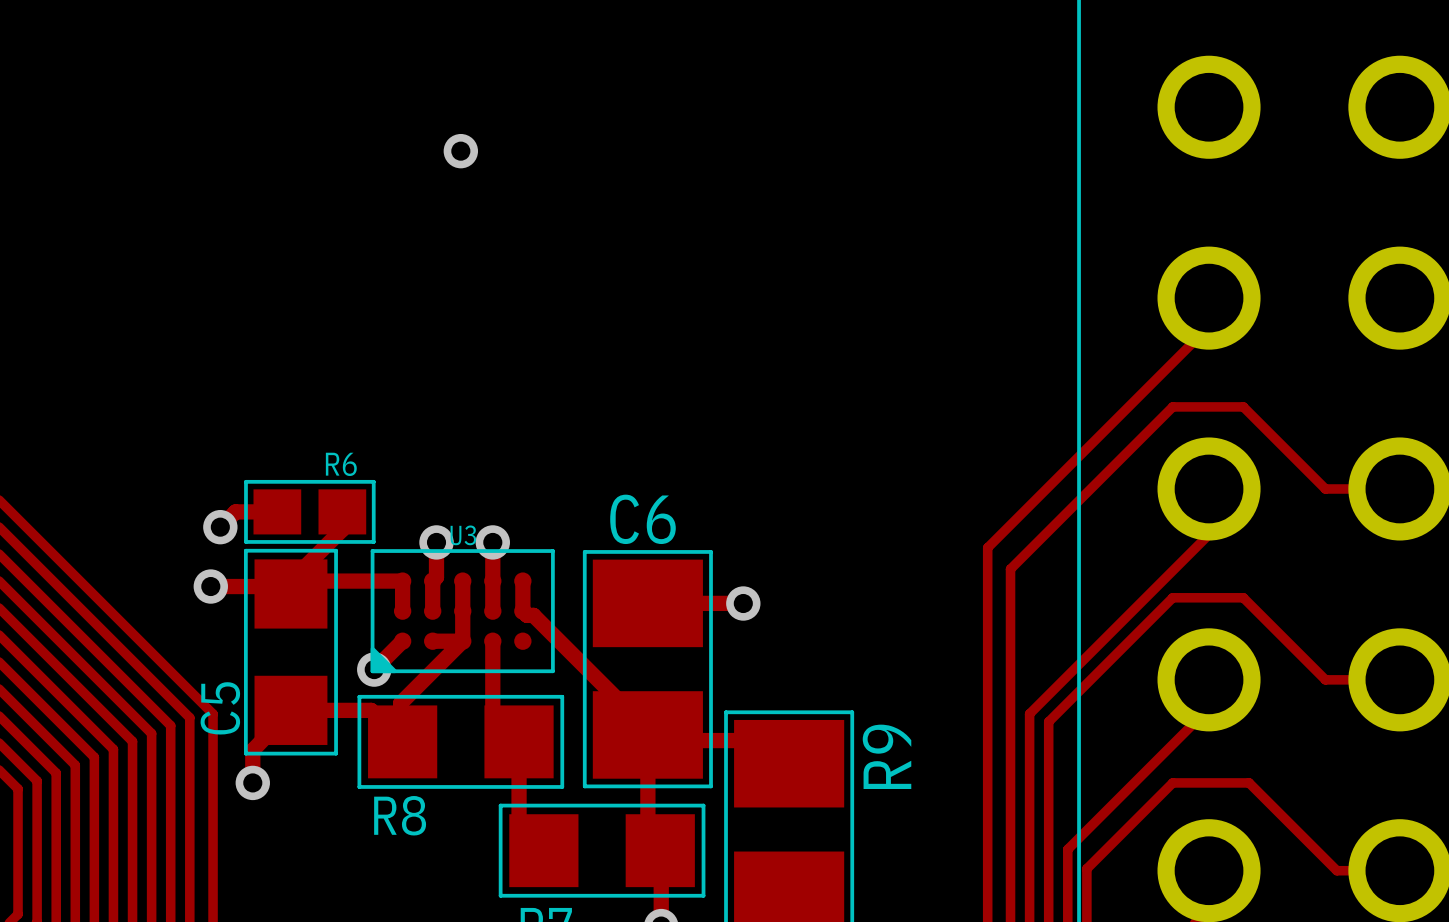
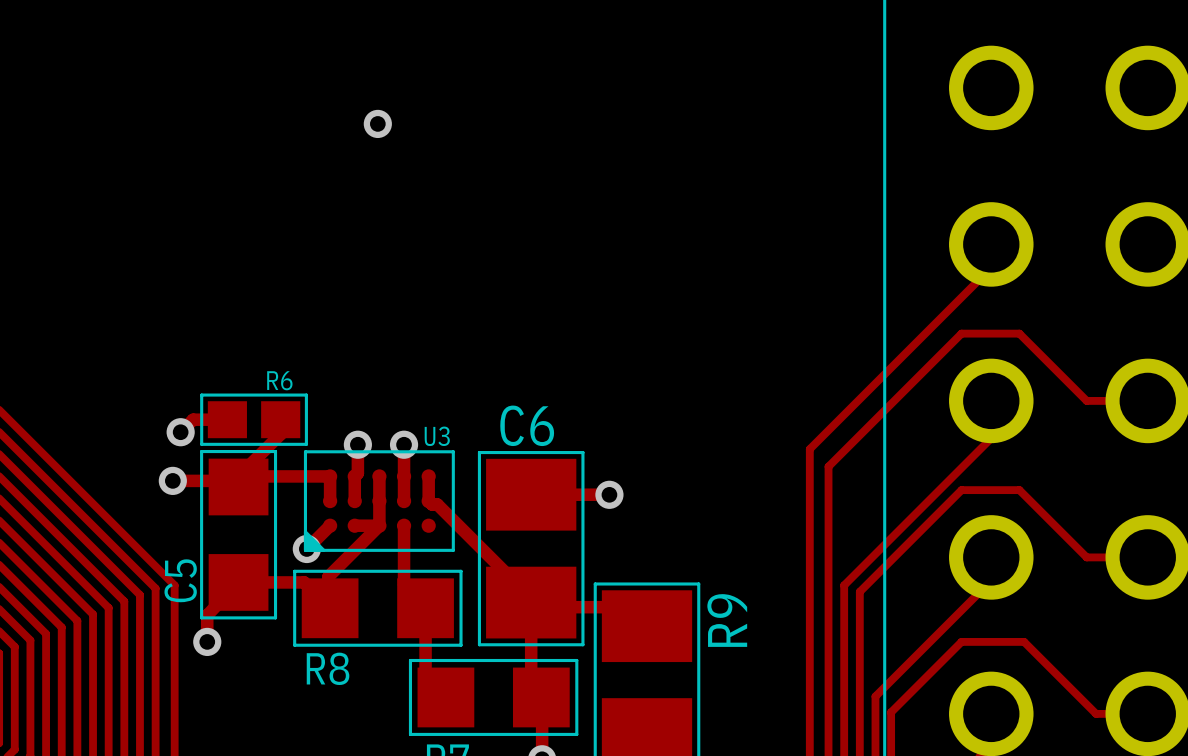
U3 name position: U3 (463, 535) -> U3 (437, 436)

